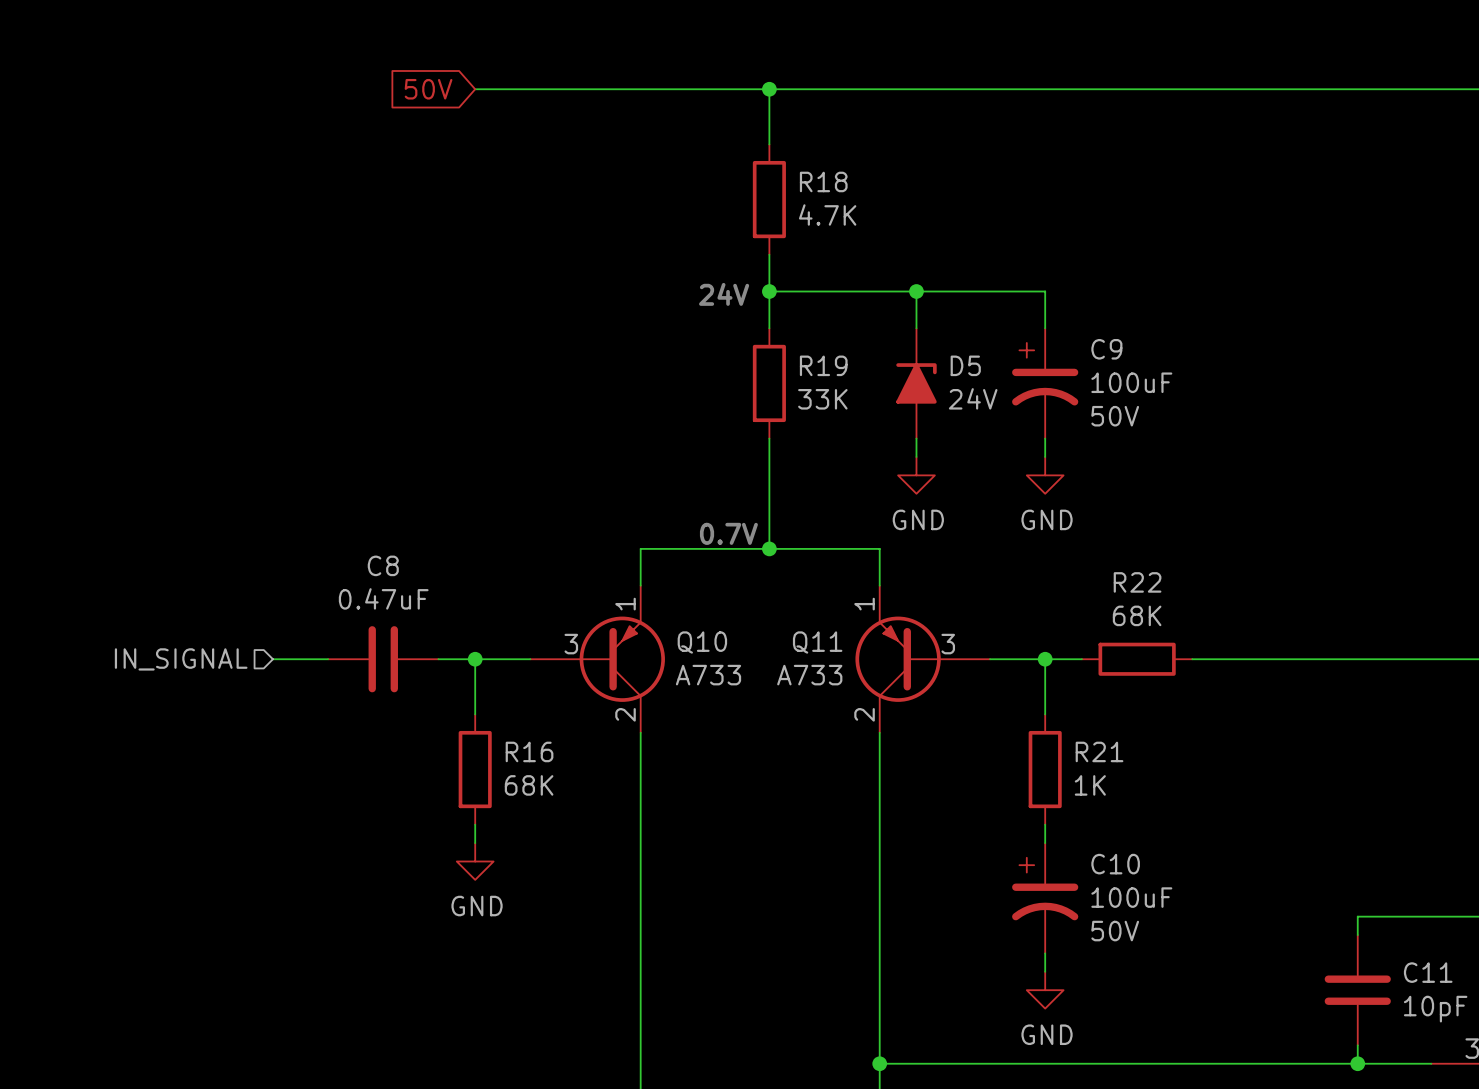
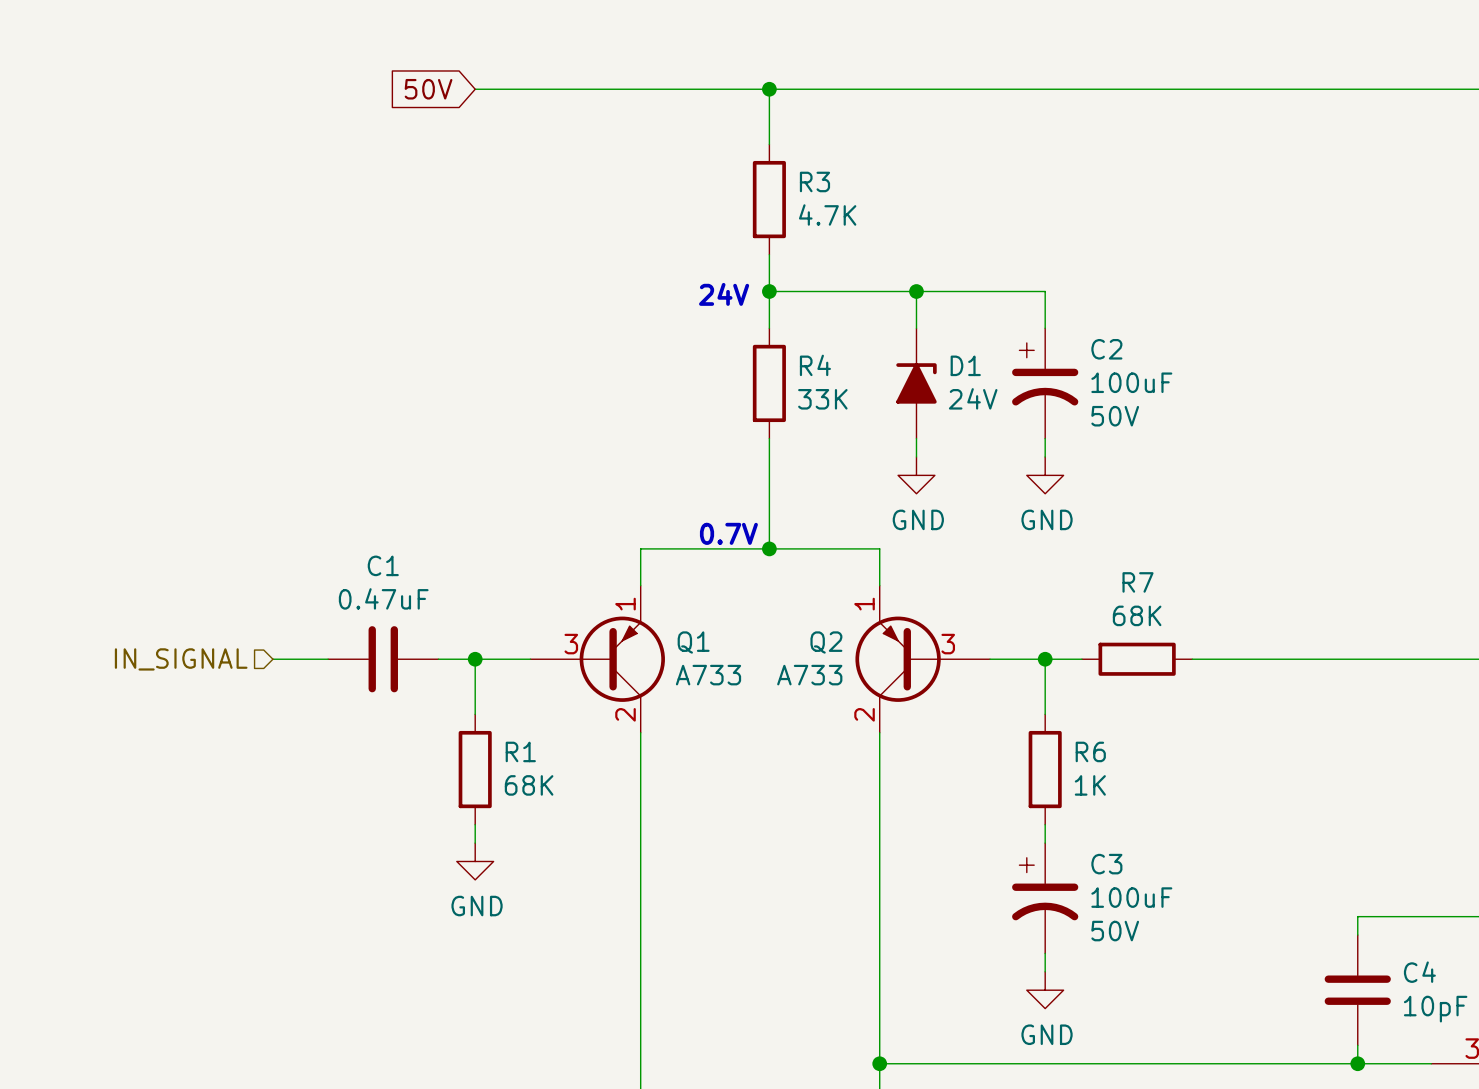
R18 name: R18 (823, 181) -> R3 (814, 181)
C9 name: C9 (1106, 349) -> C2 (1106, 349)
R19 name: R19 (823, 365) -> R4 (815, 365)
D5 name: D5 (965, 365) -> D1 (965, 365)
C8 name: C8 (383, 565) -> C1 (383, 565)
R22 name: R22 (1137, 582) -> R7 (1138, 582)
Q10 name: Q10 (702, 642) -> Q1 (693, 642)
Q11 name: Q11 (817, 642) -> Q2 (826, 642)
R16 name: R16 (529, 751) -> R1 (520, 751)
R21 name: R21 (1099, 751) -> R6 (1090, 751)
C10 name: C10 (1115, 864) -> C3 (1106, 864)
C11 name: C11 (1428, 972) -> C4 (1419, 972)

